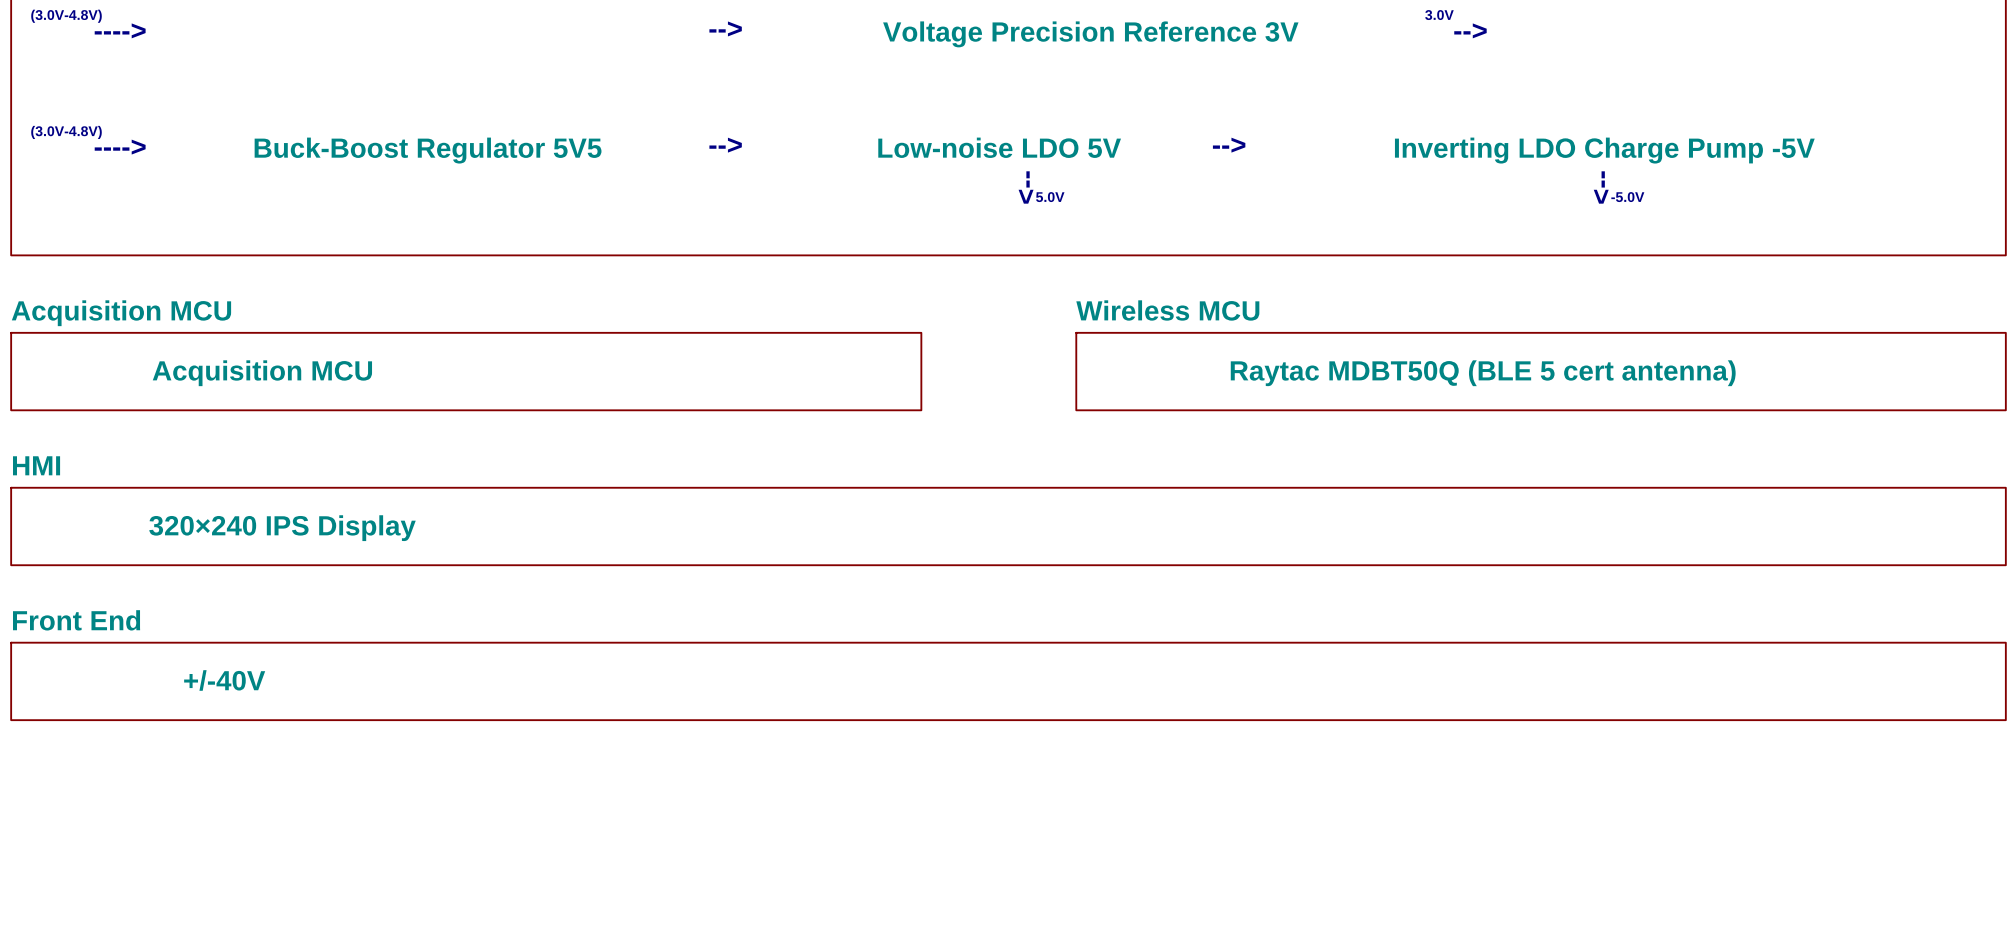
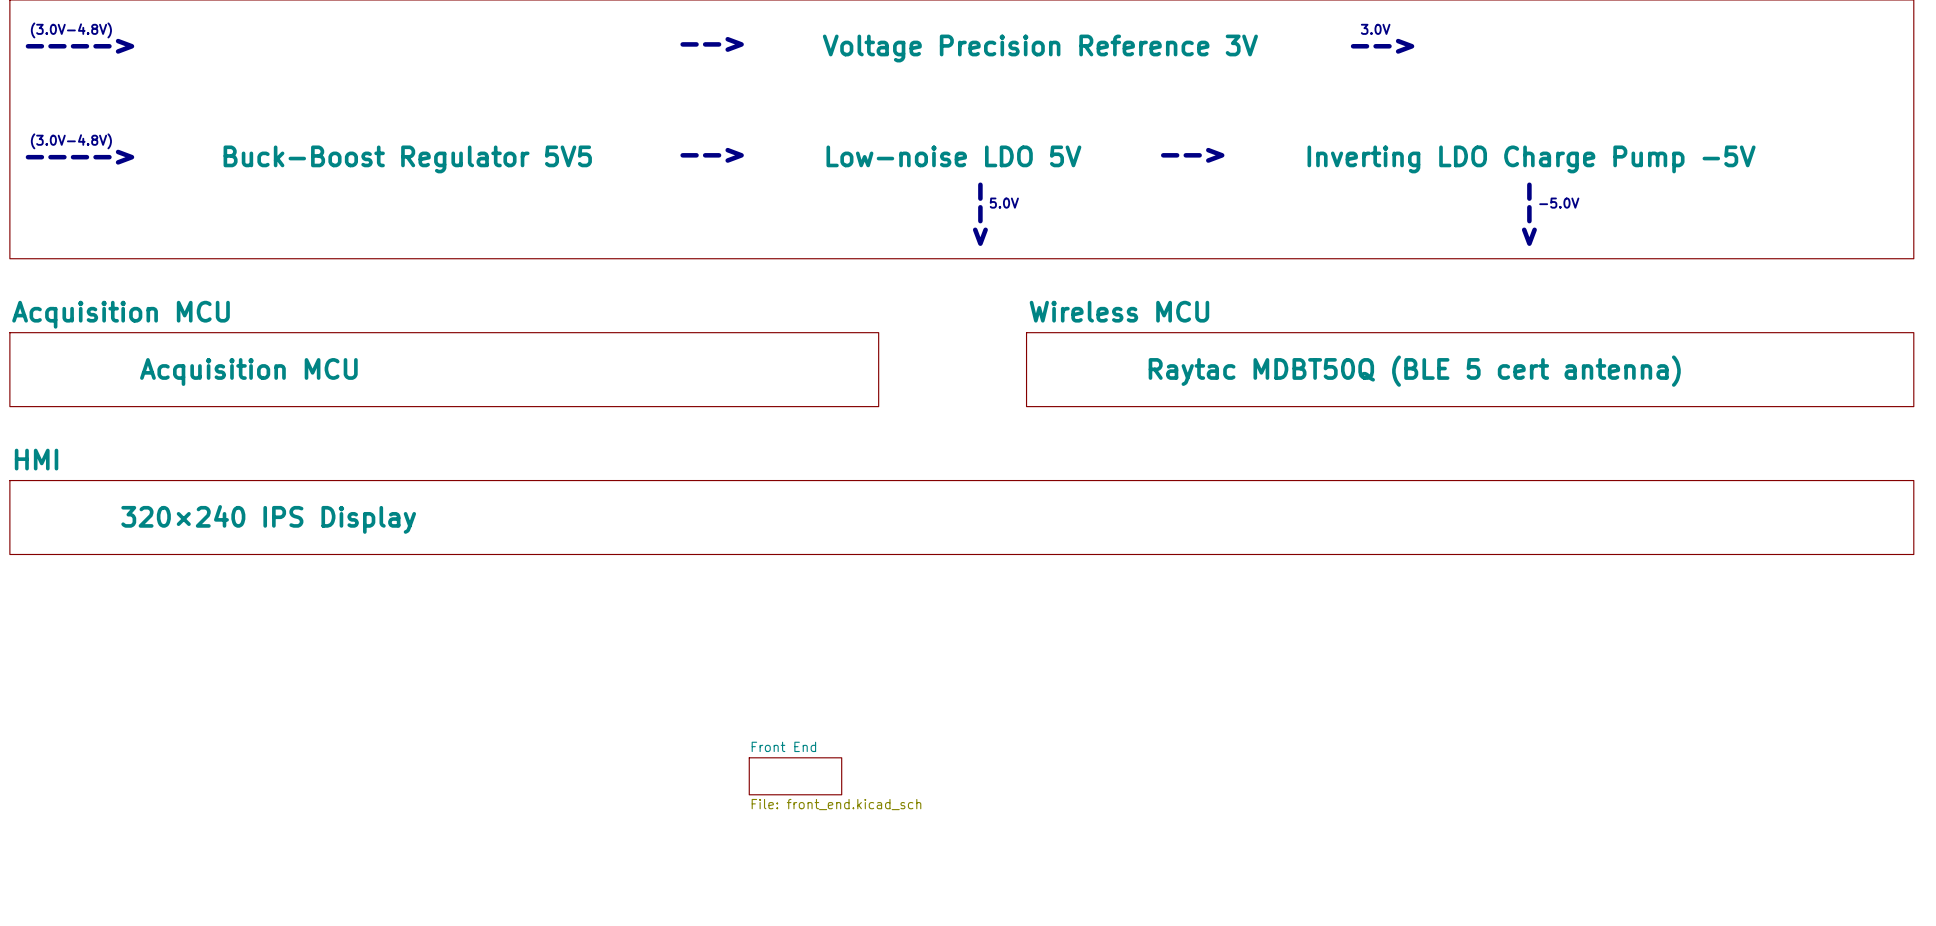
sheet Front End: (1008, 681) -> none
sheet Front End: none -> File: front_end.kicad_sch (795, 776)

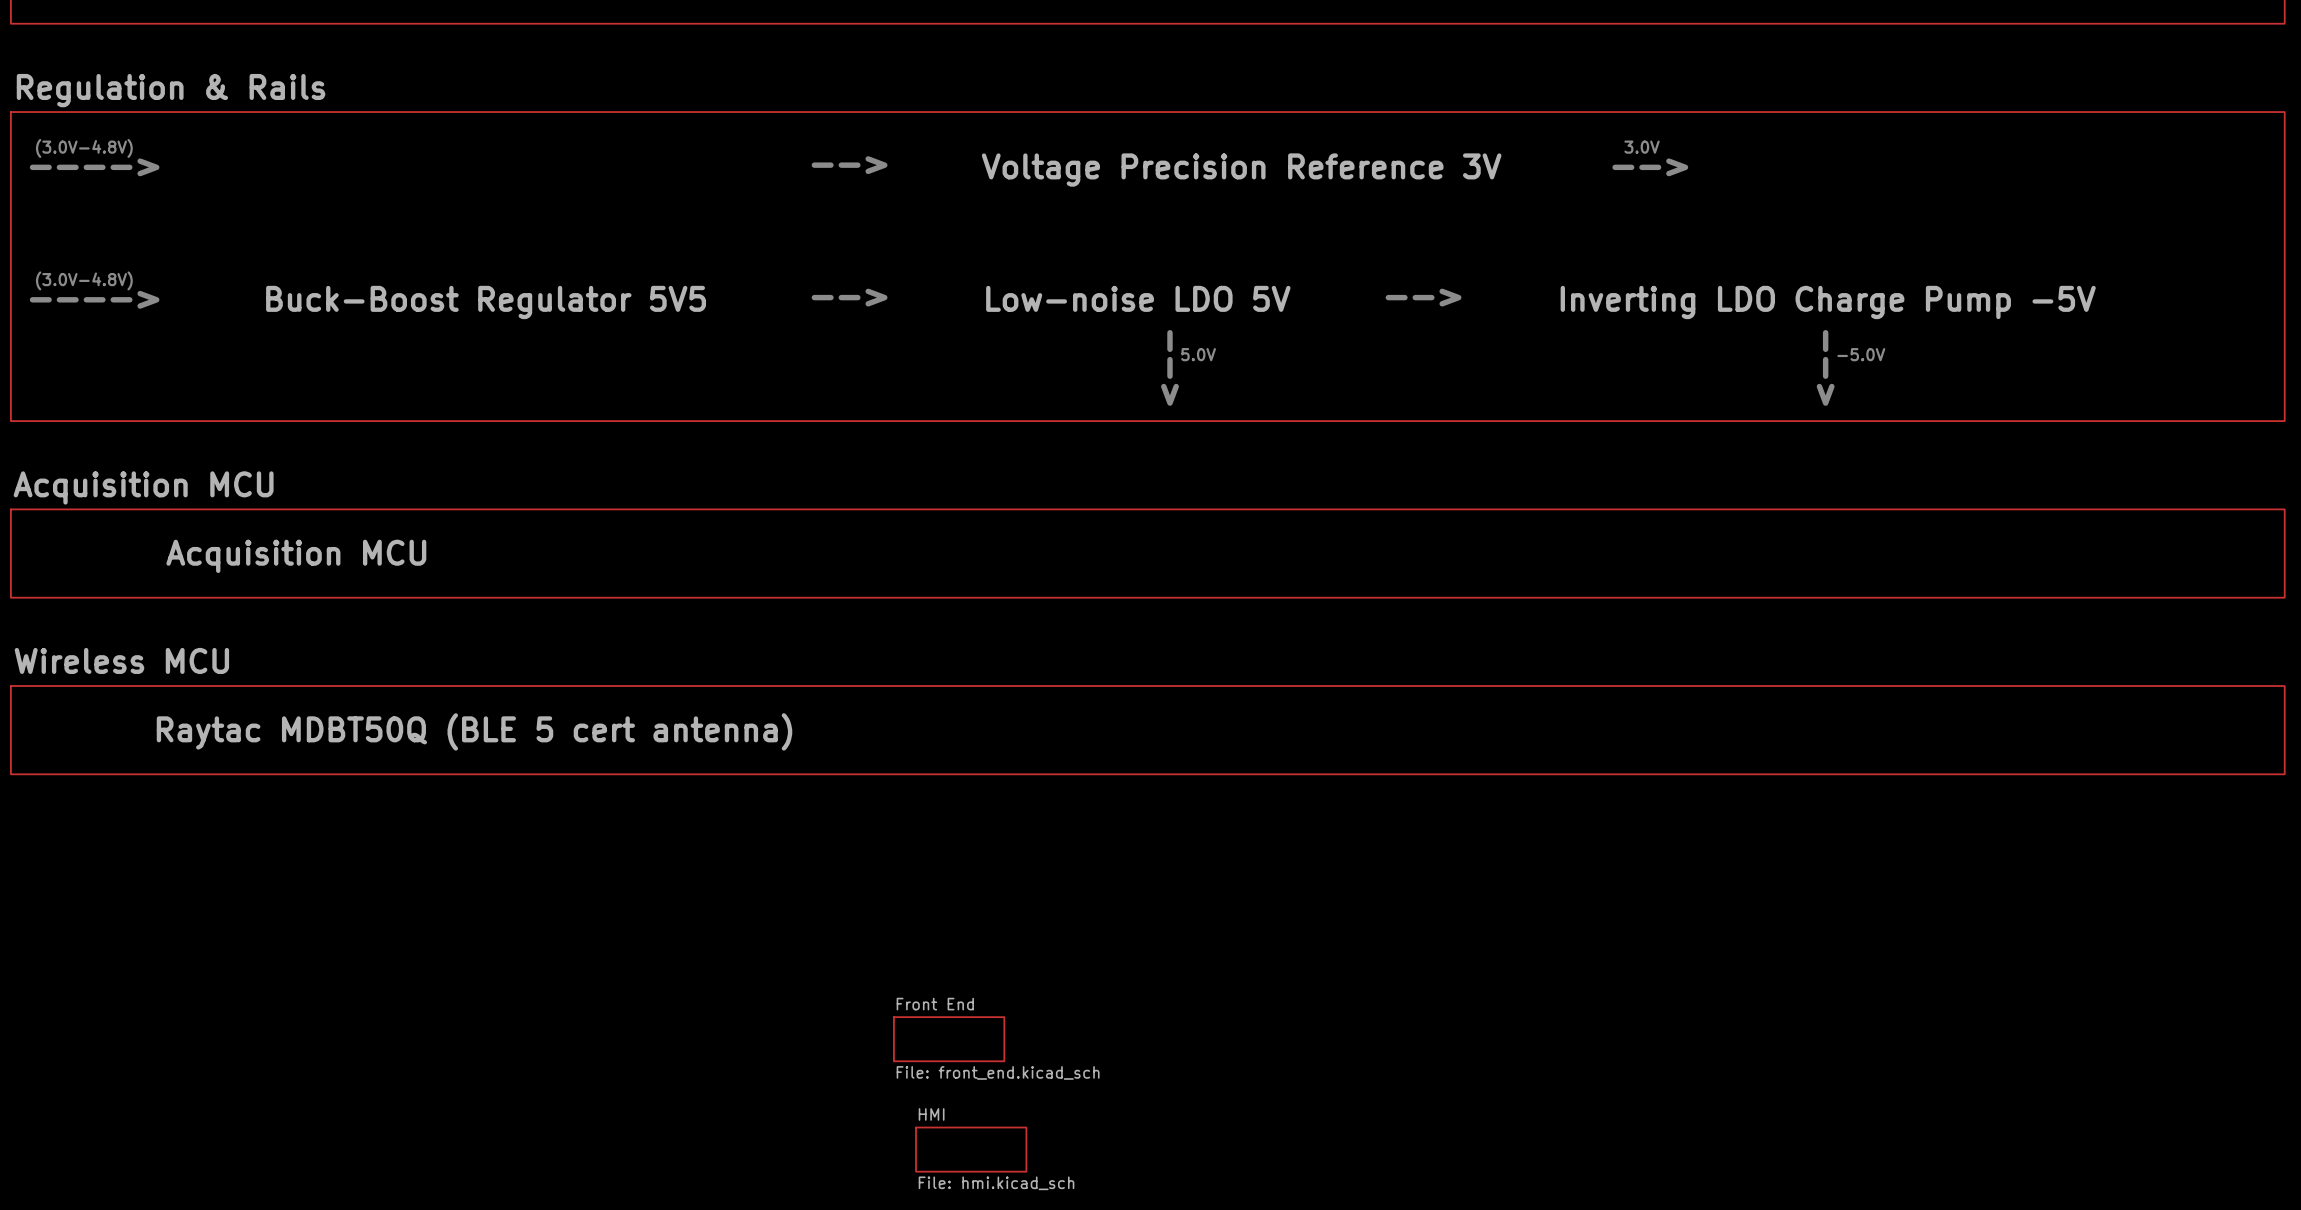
sheet Acquisition MCU: (444, 369) -> none
sheet Acquisition MCU: none -> (1147, 553)
sheet Wireless MCU: (1470, 369) -> none
sheet HMI name: HMI (36, 459) -> Wireless MCU (121, 660)
sheet HMI text: 320×240 IPS Display (268, 519) -> none
sheet HMI text: none -> Raytac MDBT50Q (BLE 5 cert antenna) (474, 731)
sheet HMI: none -> File: hmi.kicad_sch (971, 1149)

